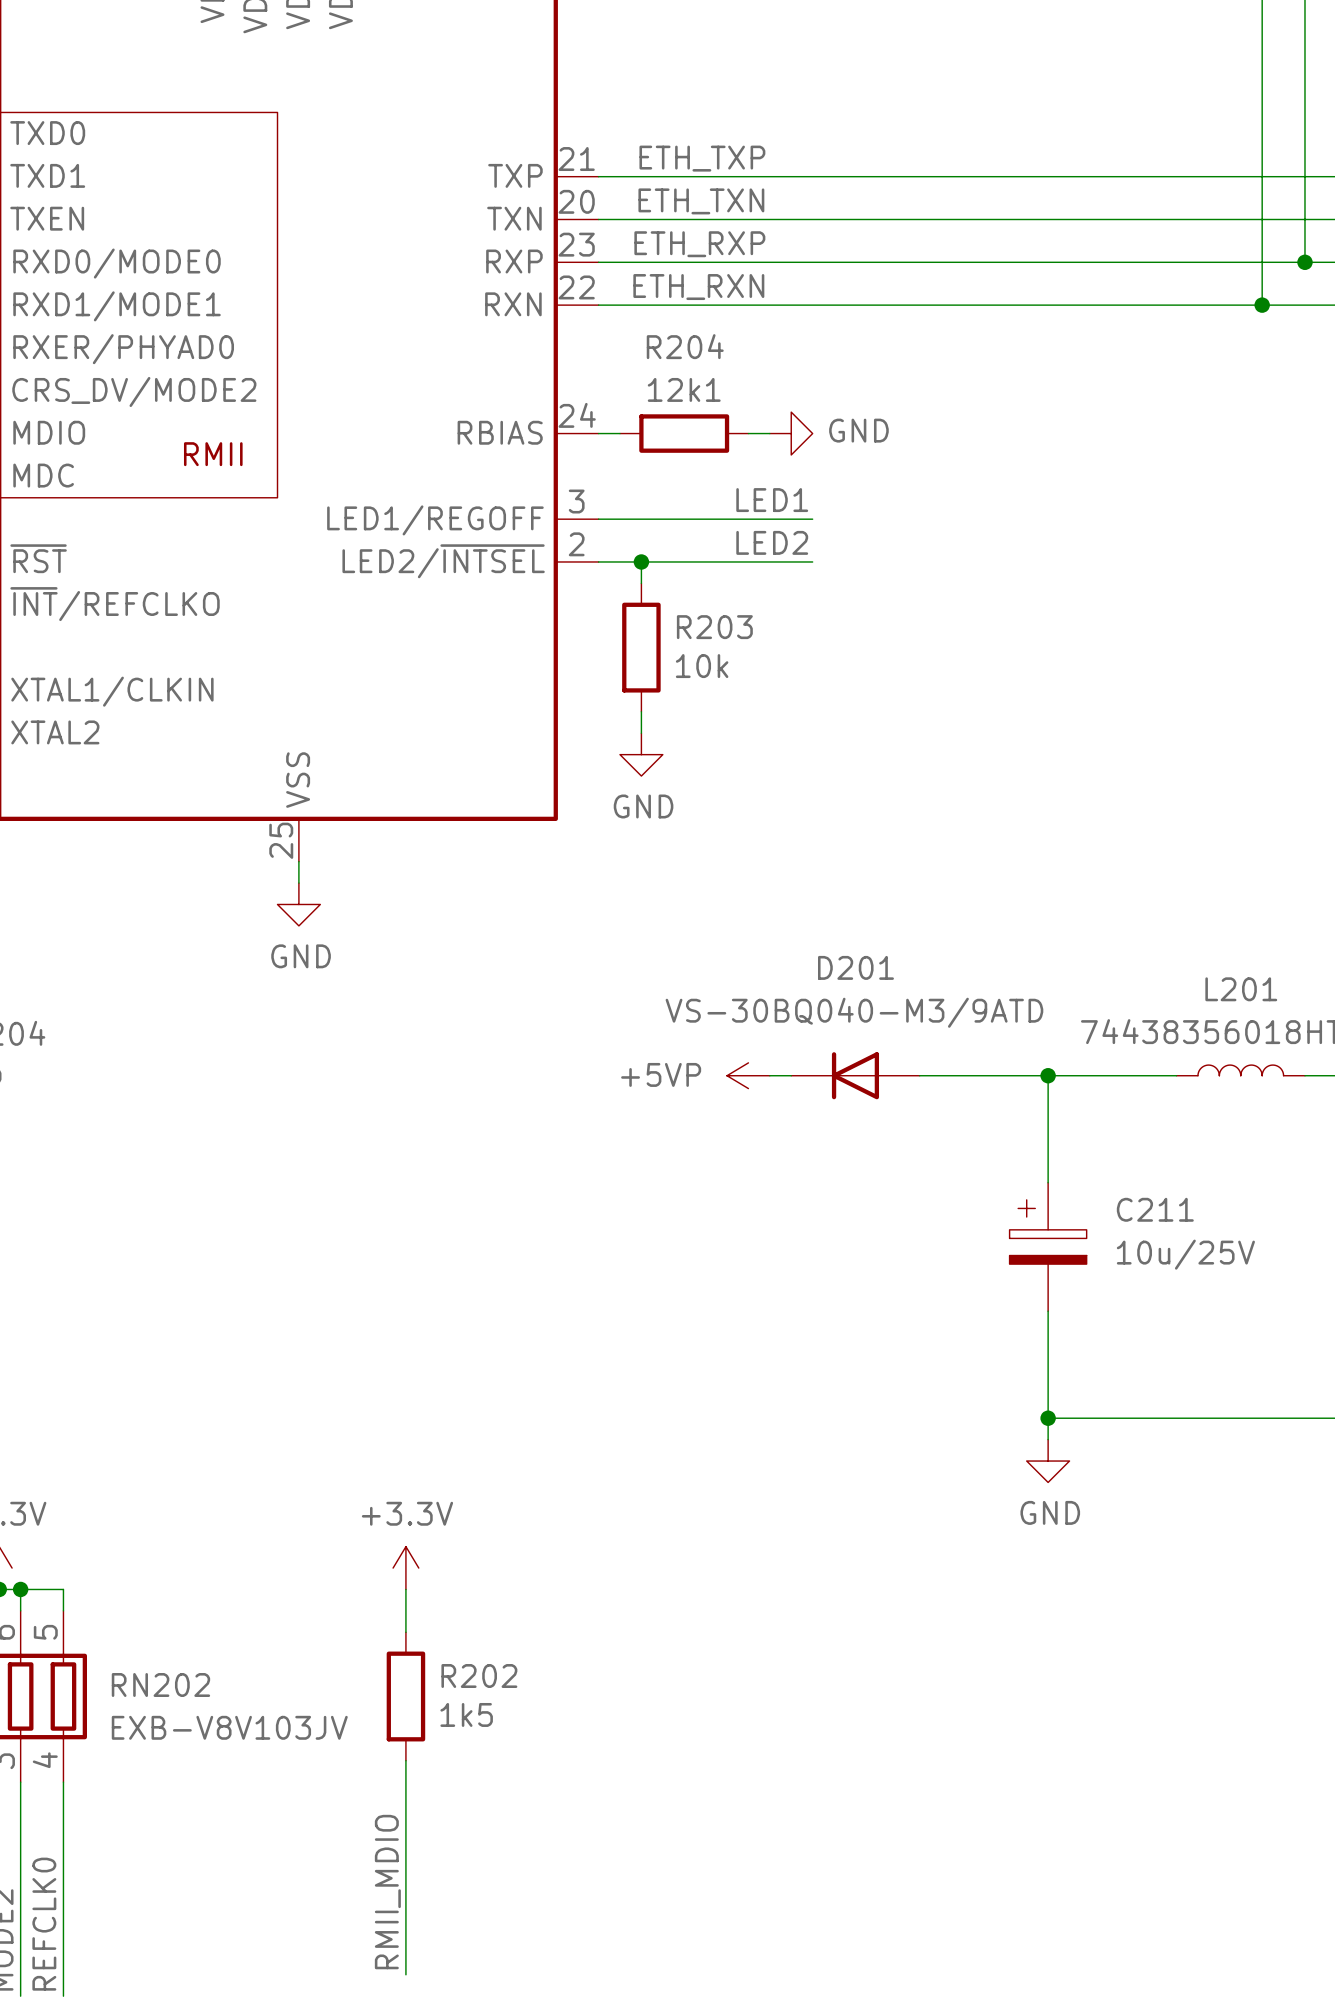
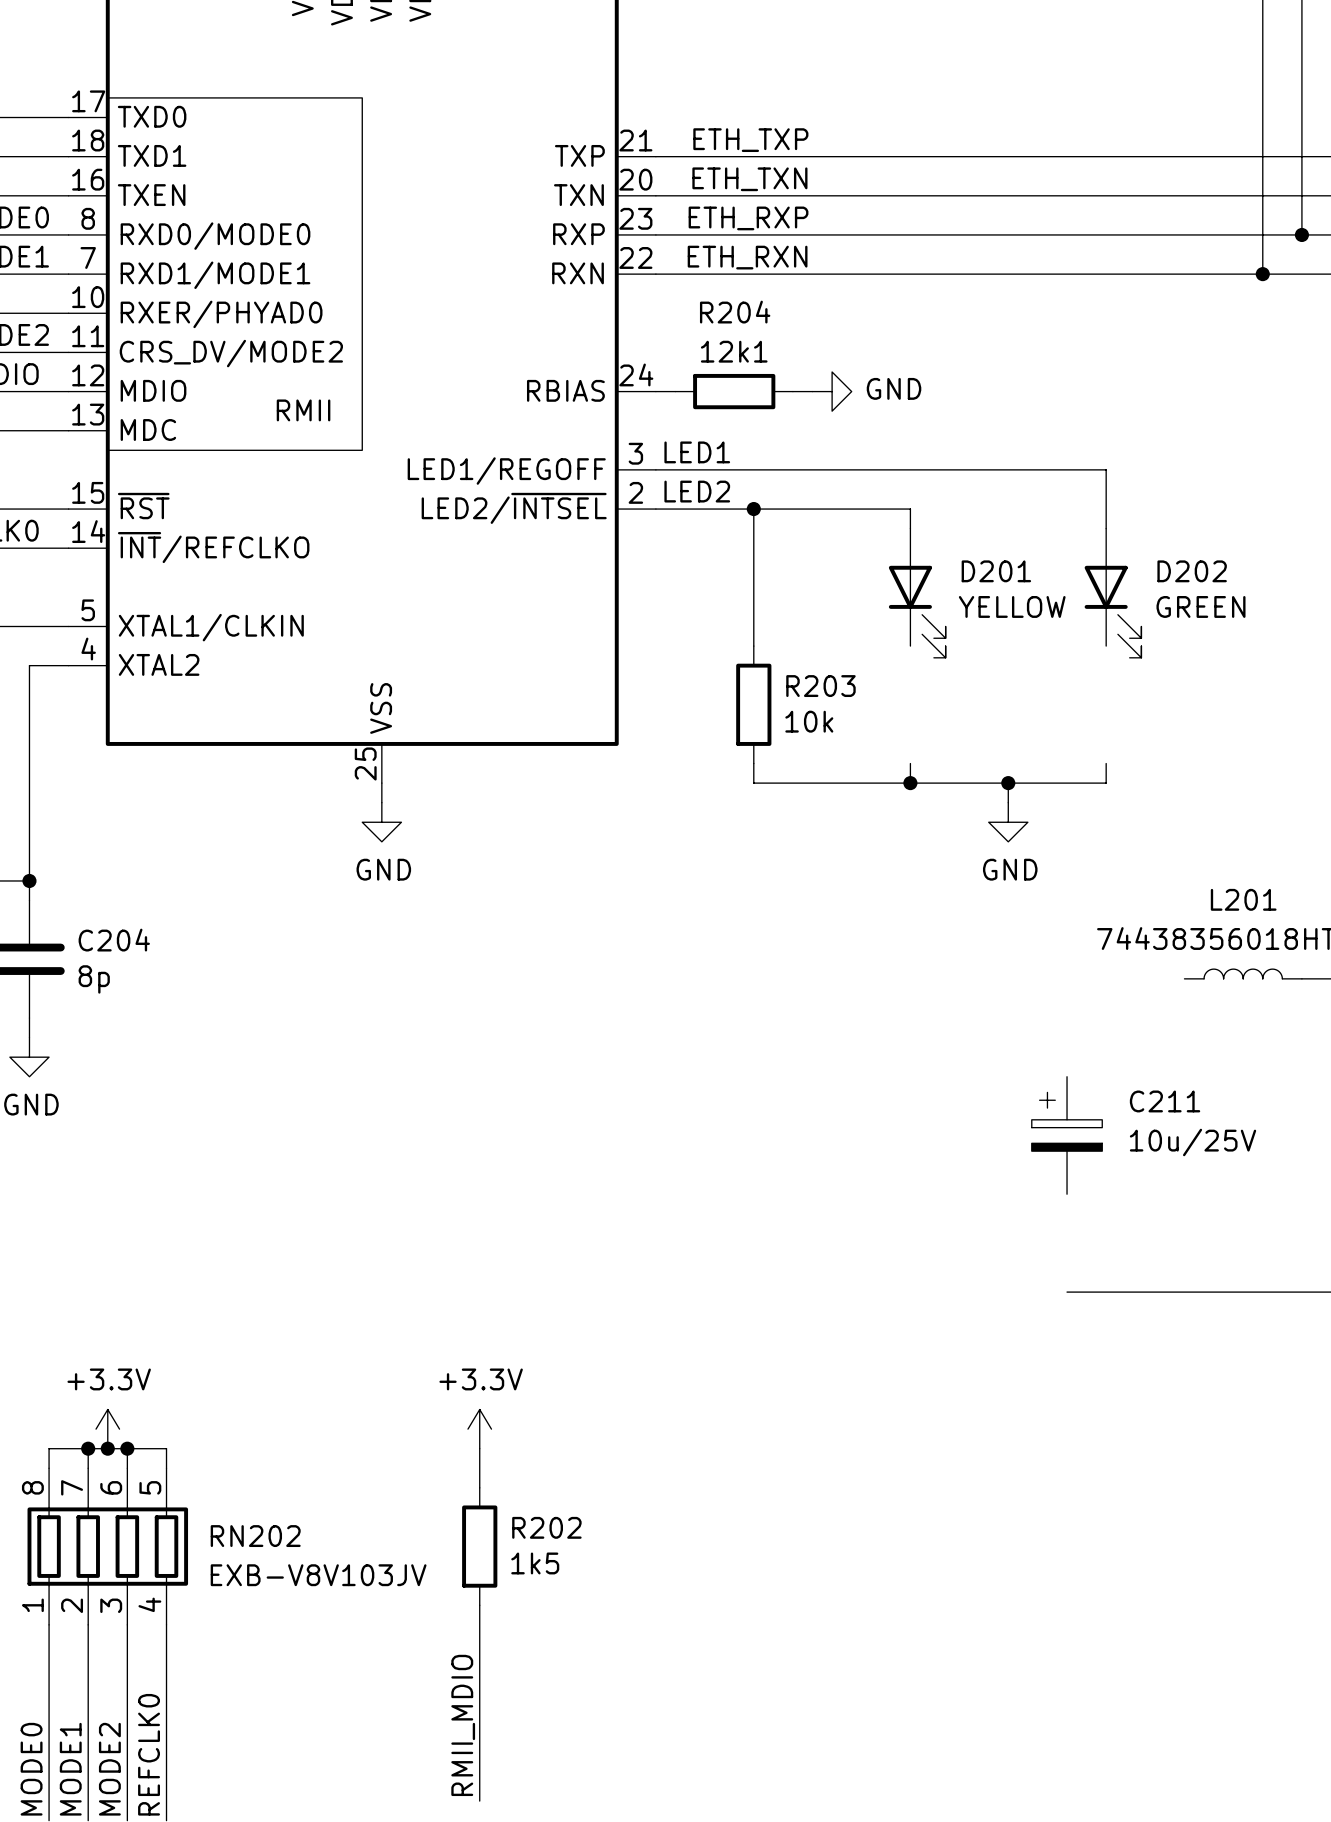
label position: LED1 (772, 500) -> LED1 (697, 452)
wire: none -> (851, 469) (1106, 469) (1106, 528)
label position: LED2 (772, 542) -> LED2 (697, 491)
wire: (641, 561) (641, 583) -> none
junction position: (641, 561) -> (753, 509)
wire: none -> (753, 509) (753, 646)
wire: none -> (851, 509) (910, 509) (910, 528)
R203 position: (641, 647) -> (753, 704)
D202: none -> GREEN (1113, 593)
wire: (641, 711) (641, 733) -> (910, 763) (910, 783)
power symbol: GND (641, 754) -> none
wire: none -> (753, 763) (753, 783) (1106, 783) (1106, 763)
junction: none -> (910, 783)
wire: none -> (1008, 783) (1008, 802)
junction: none -> (1008, 783)
power symbol: none -> GND (1008, 822)
D201 name position: D201 (855, 967) -> D201 (996, 571)
D201 value: VS-30BQ040-M3/9ATD (854, 1012) -> YELLOW (1012, 606)
D201 symbol: [791, 1052, 920, 1100] -> [888, 528, 946, 658]
power symbol: +5VP (748, 1075) -> none
wire: (769, 1075) (791, 1075) -> none
wire: (919, 1075) (1176, 1075) -> none
wire: (1048, 1075) (1048, 1182) -> none
junction: (1048, 1075) -> none
wire: (1048, 1311) (1048, 1439) -> none
junction: (1048, 1418) -> none
power symbol: GND (1048, 1461) -> none

